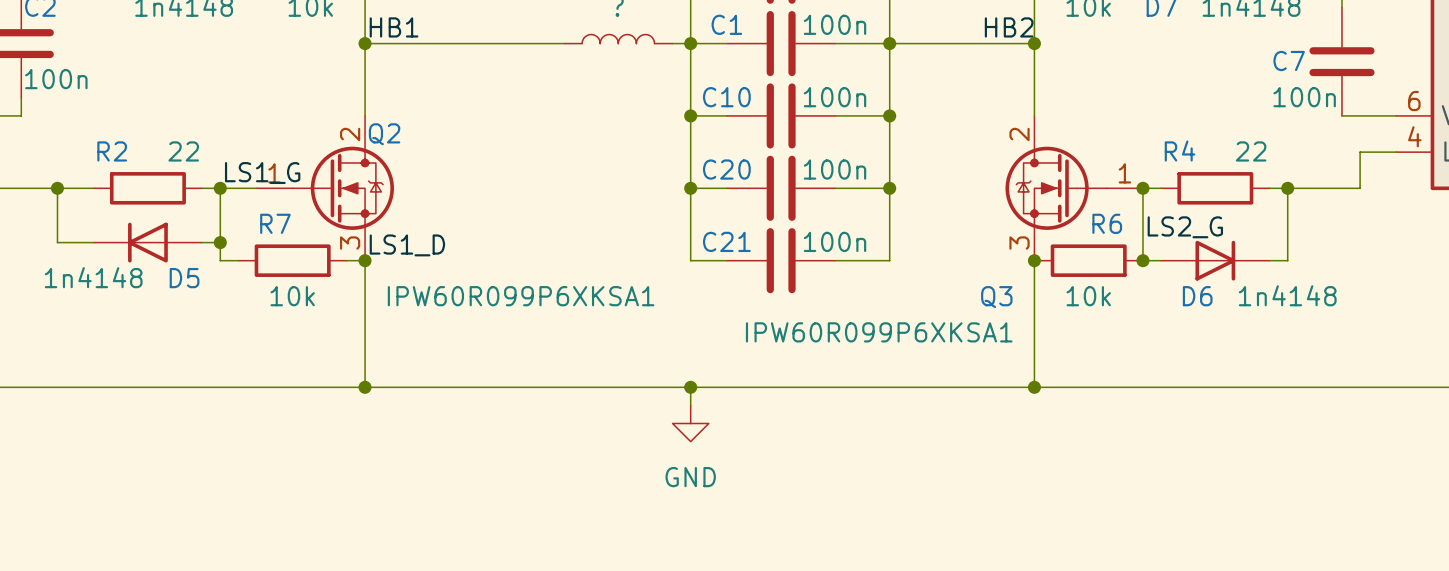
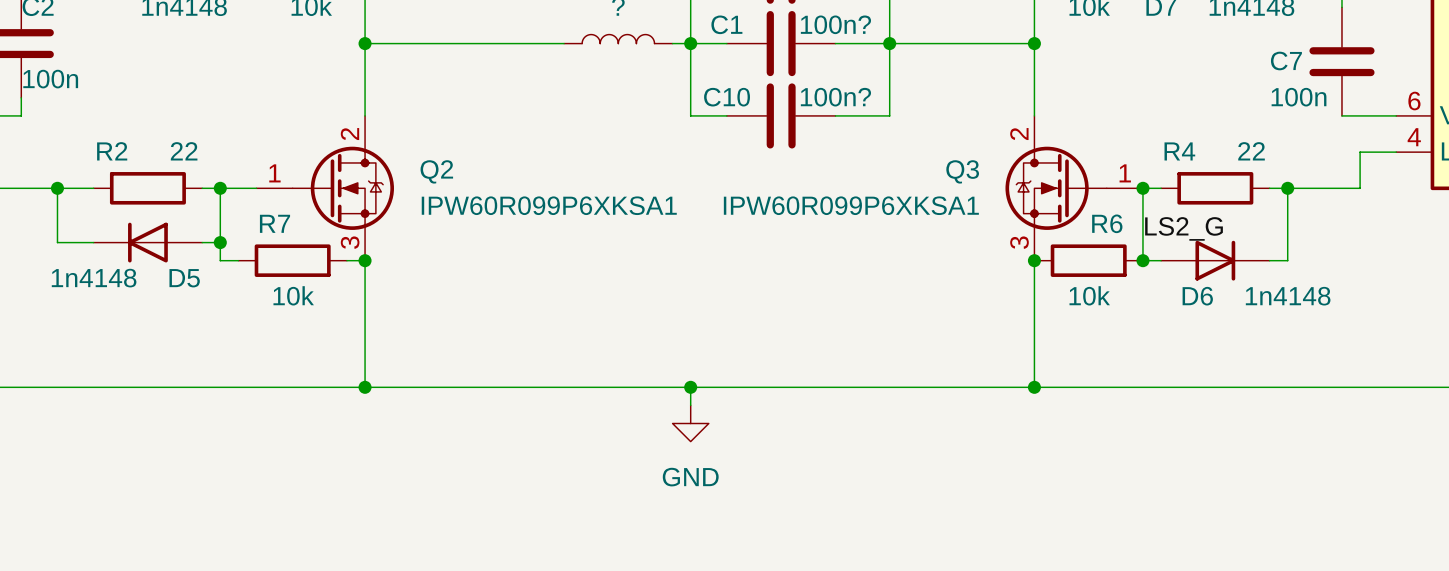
C1 value: 100n (834, 24) -> 100n? (835, 24)
label: HB1 (394, 27) -> none
label: HB2 (1009, 27) -> none
C10 value: 100n (834, 97) -> 100n? (835, 97)
wire: (690, 115) (690, 260) (726, 260) -> none
junction: (690, 115) -> none
wire: (889, 115) (889, 260) (835, 260) -> none
junction: (889, 115) -> none
Q2 name position: Q2 (384, 134) -> Q2 (436, 171)
label: LS1_G (262, 173) -> none
wire: (690, 188) (726, 188) -> none
junction: (690, 188) -> none
C20: 100n (781, 188) -> none
wire: (835, 188) (889, 188) -> none
junction: (889, 188) -> none
label: LS1_D (407, 245) -> none
C21: 100n (781, 260) -> none
Q2 value position: IPW60R099P6XKSA1 (521, 296) -> IPW60R099P6XKSA1 (549, 205)
Q3 name position: Q3 (996, 297) -> Q3 (962, 171)
Q3 value position: IPW60R099P6XKSA1 (879, 332) -> IPW60R099P6XKSA1 (851, 205)

